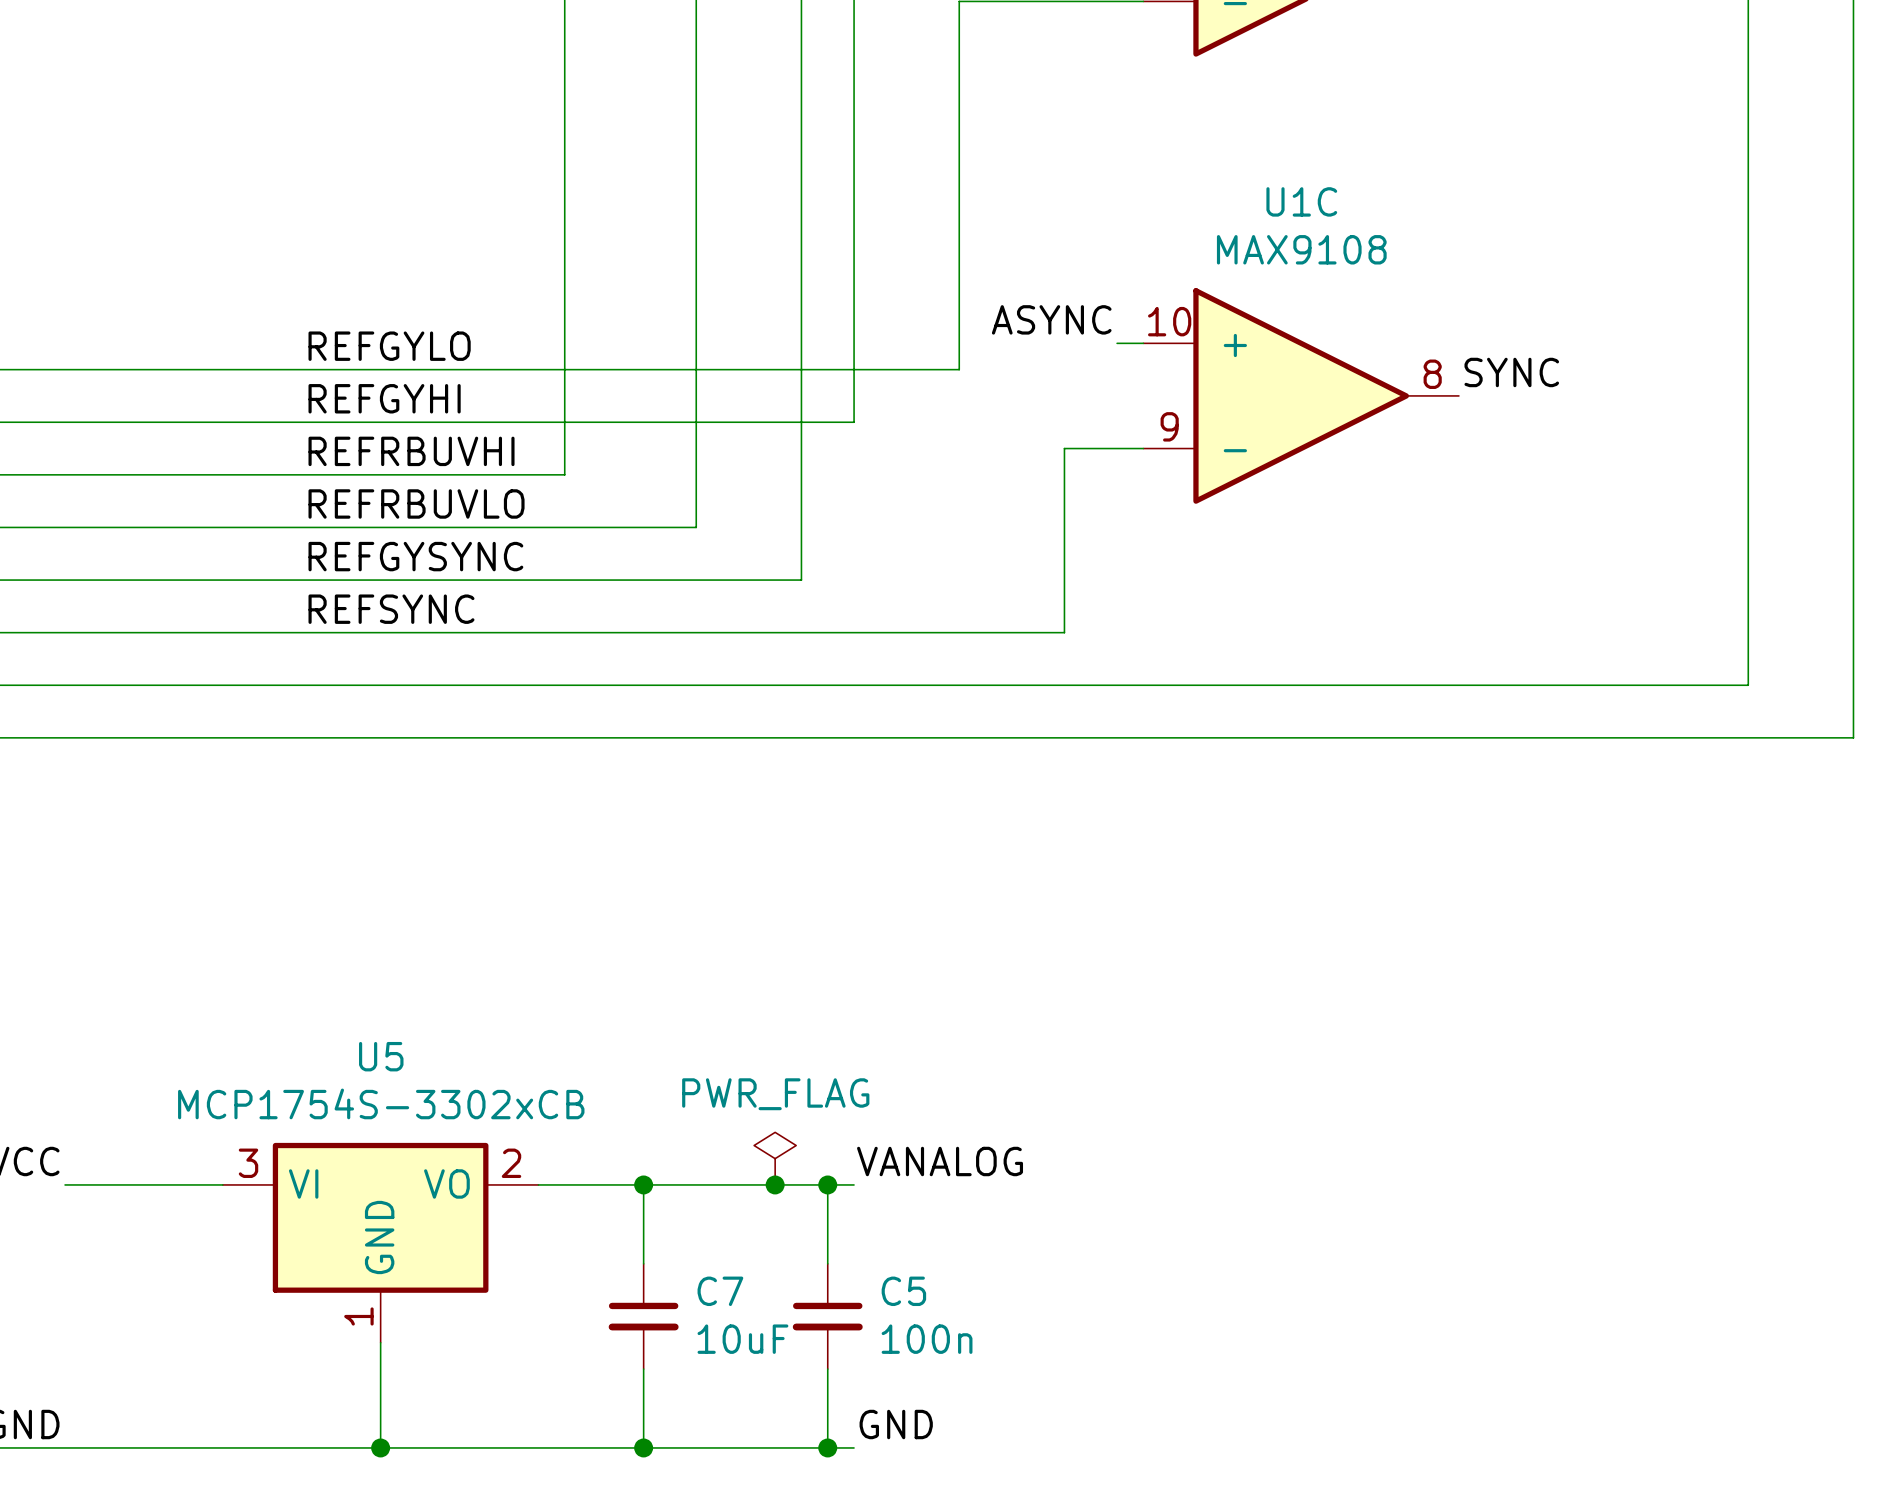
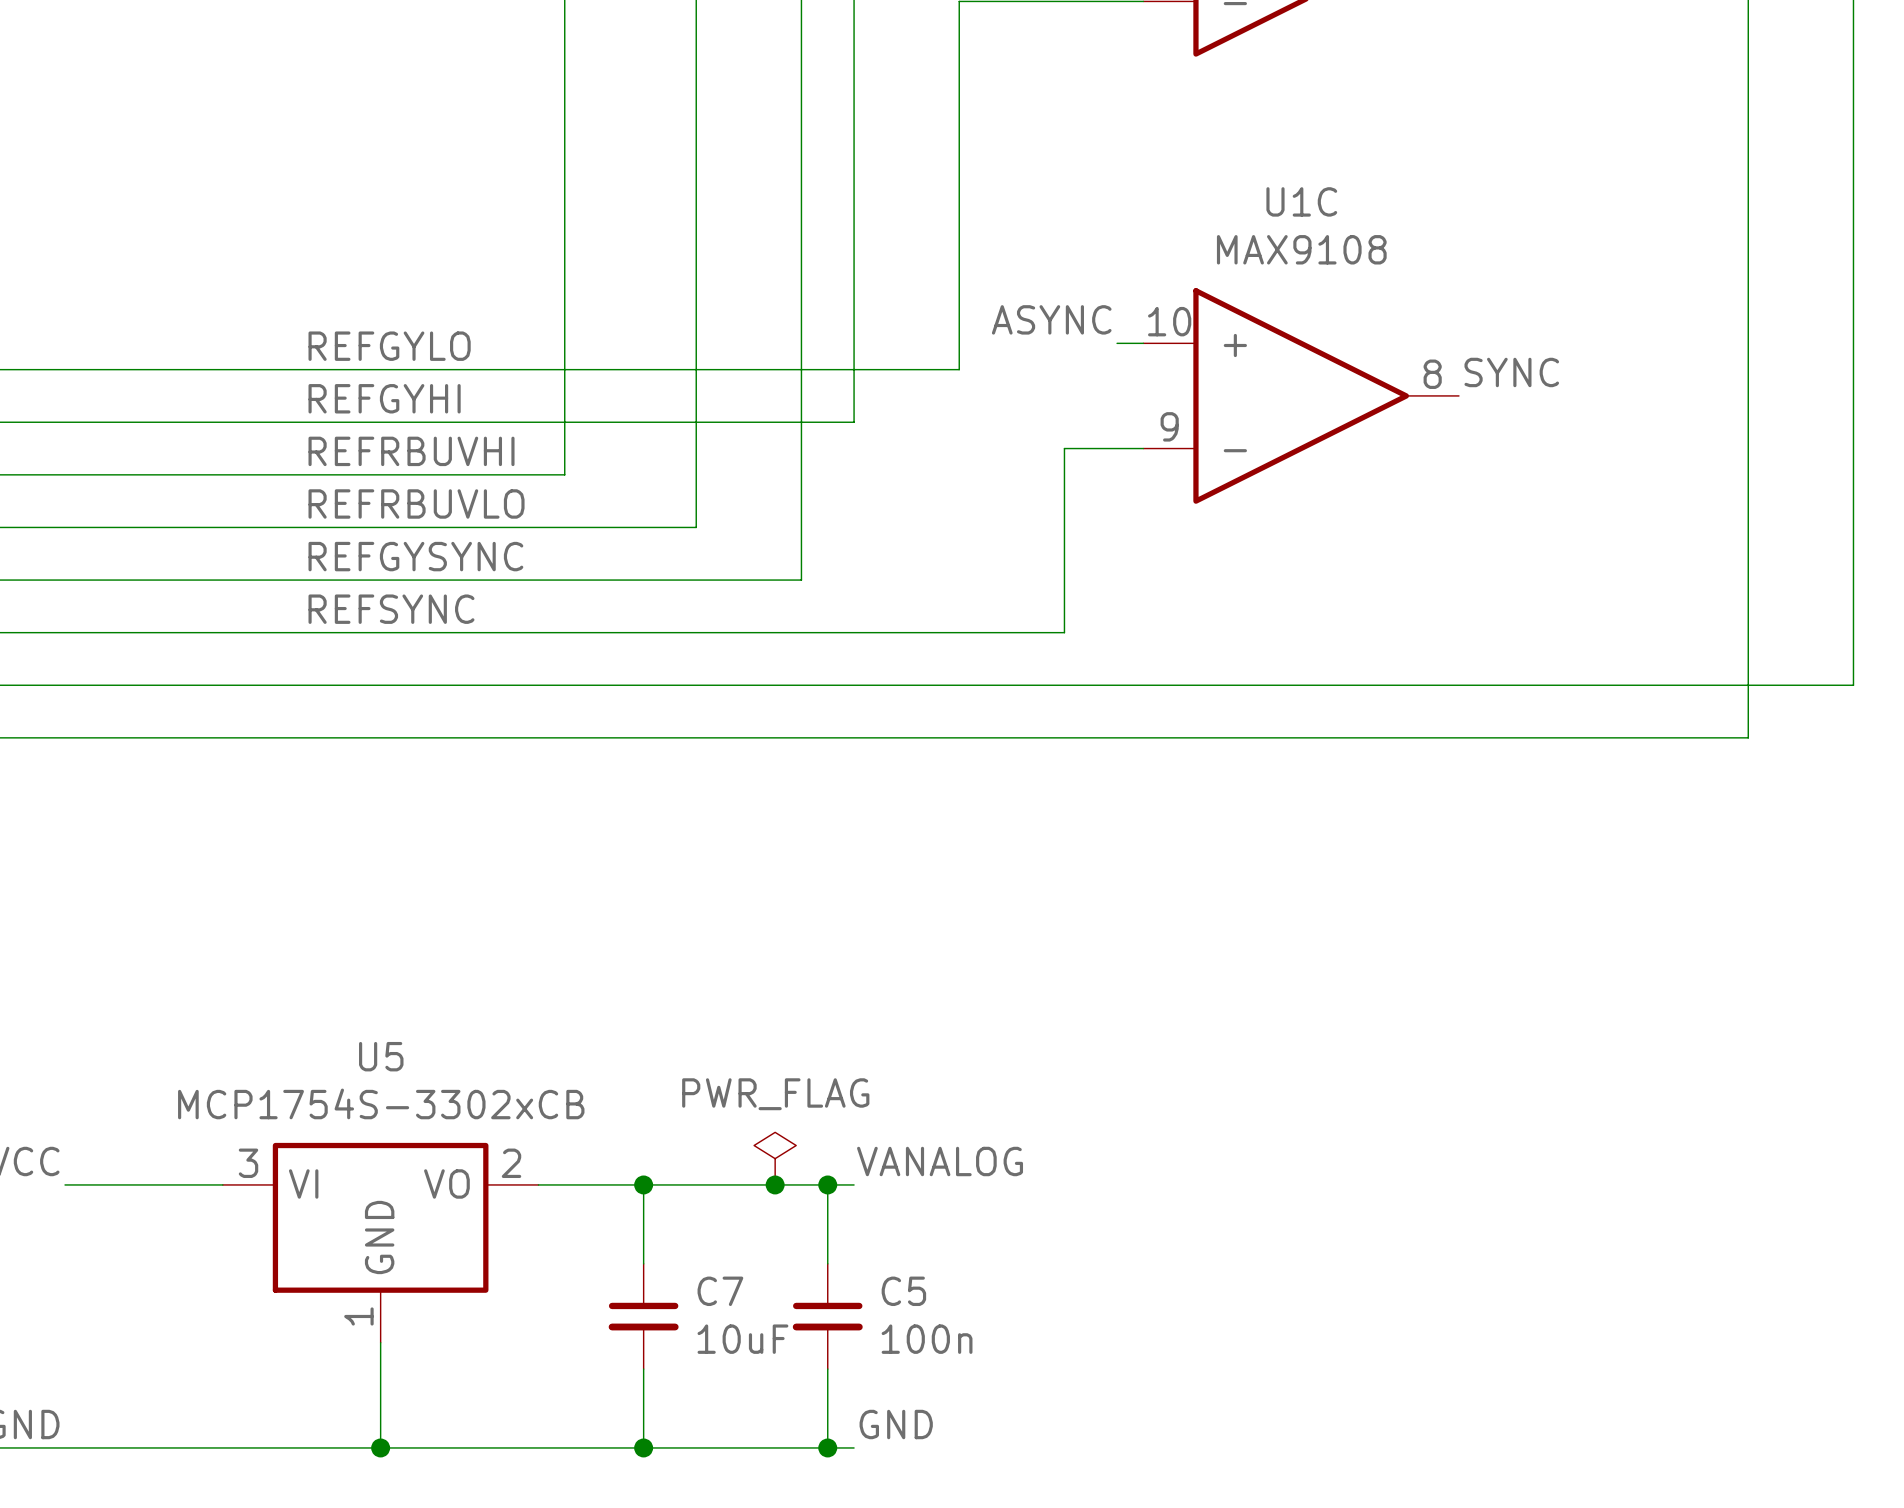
wire: (1853, 685) (1853, 737) (1748, 737) -> (1853, 685) (1748, 685) (1748, 737)

